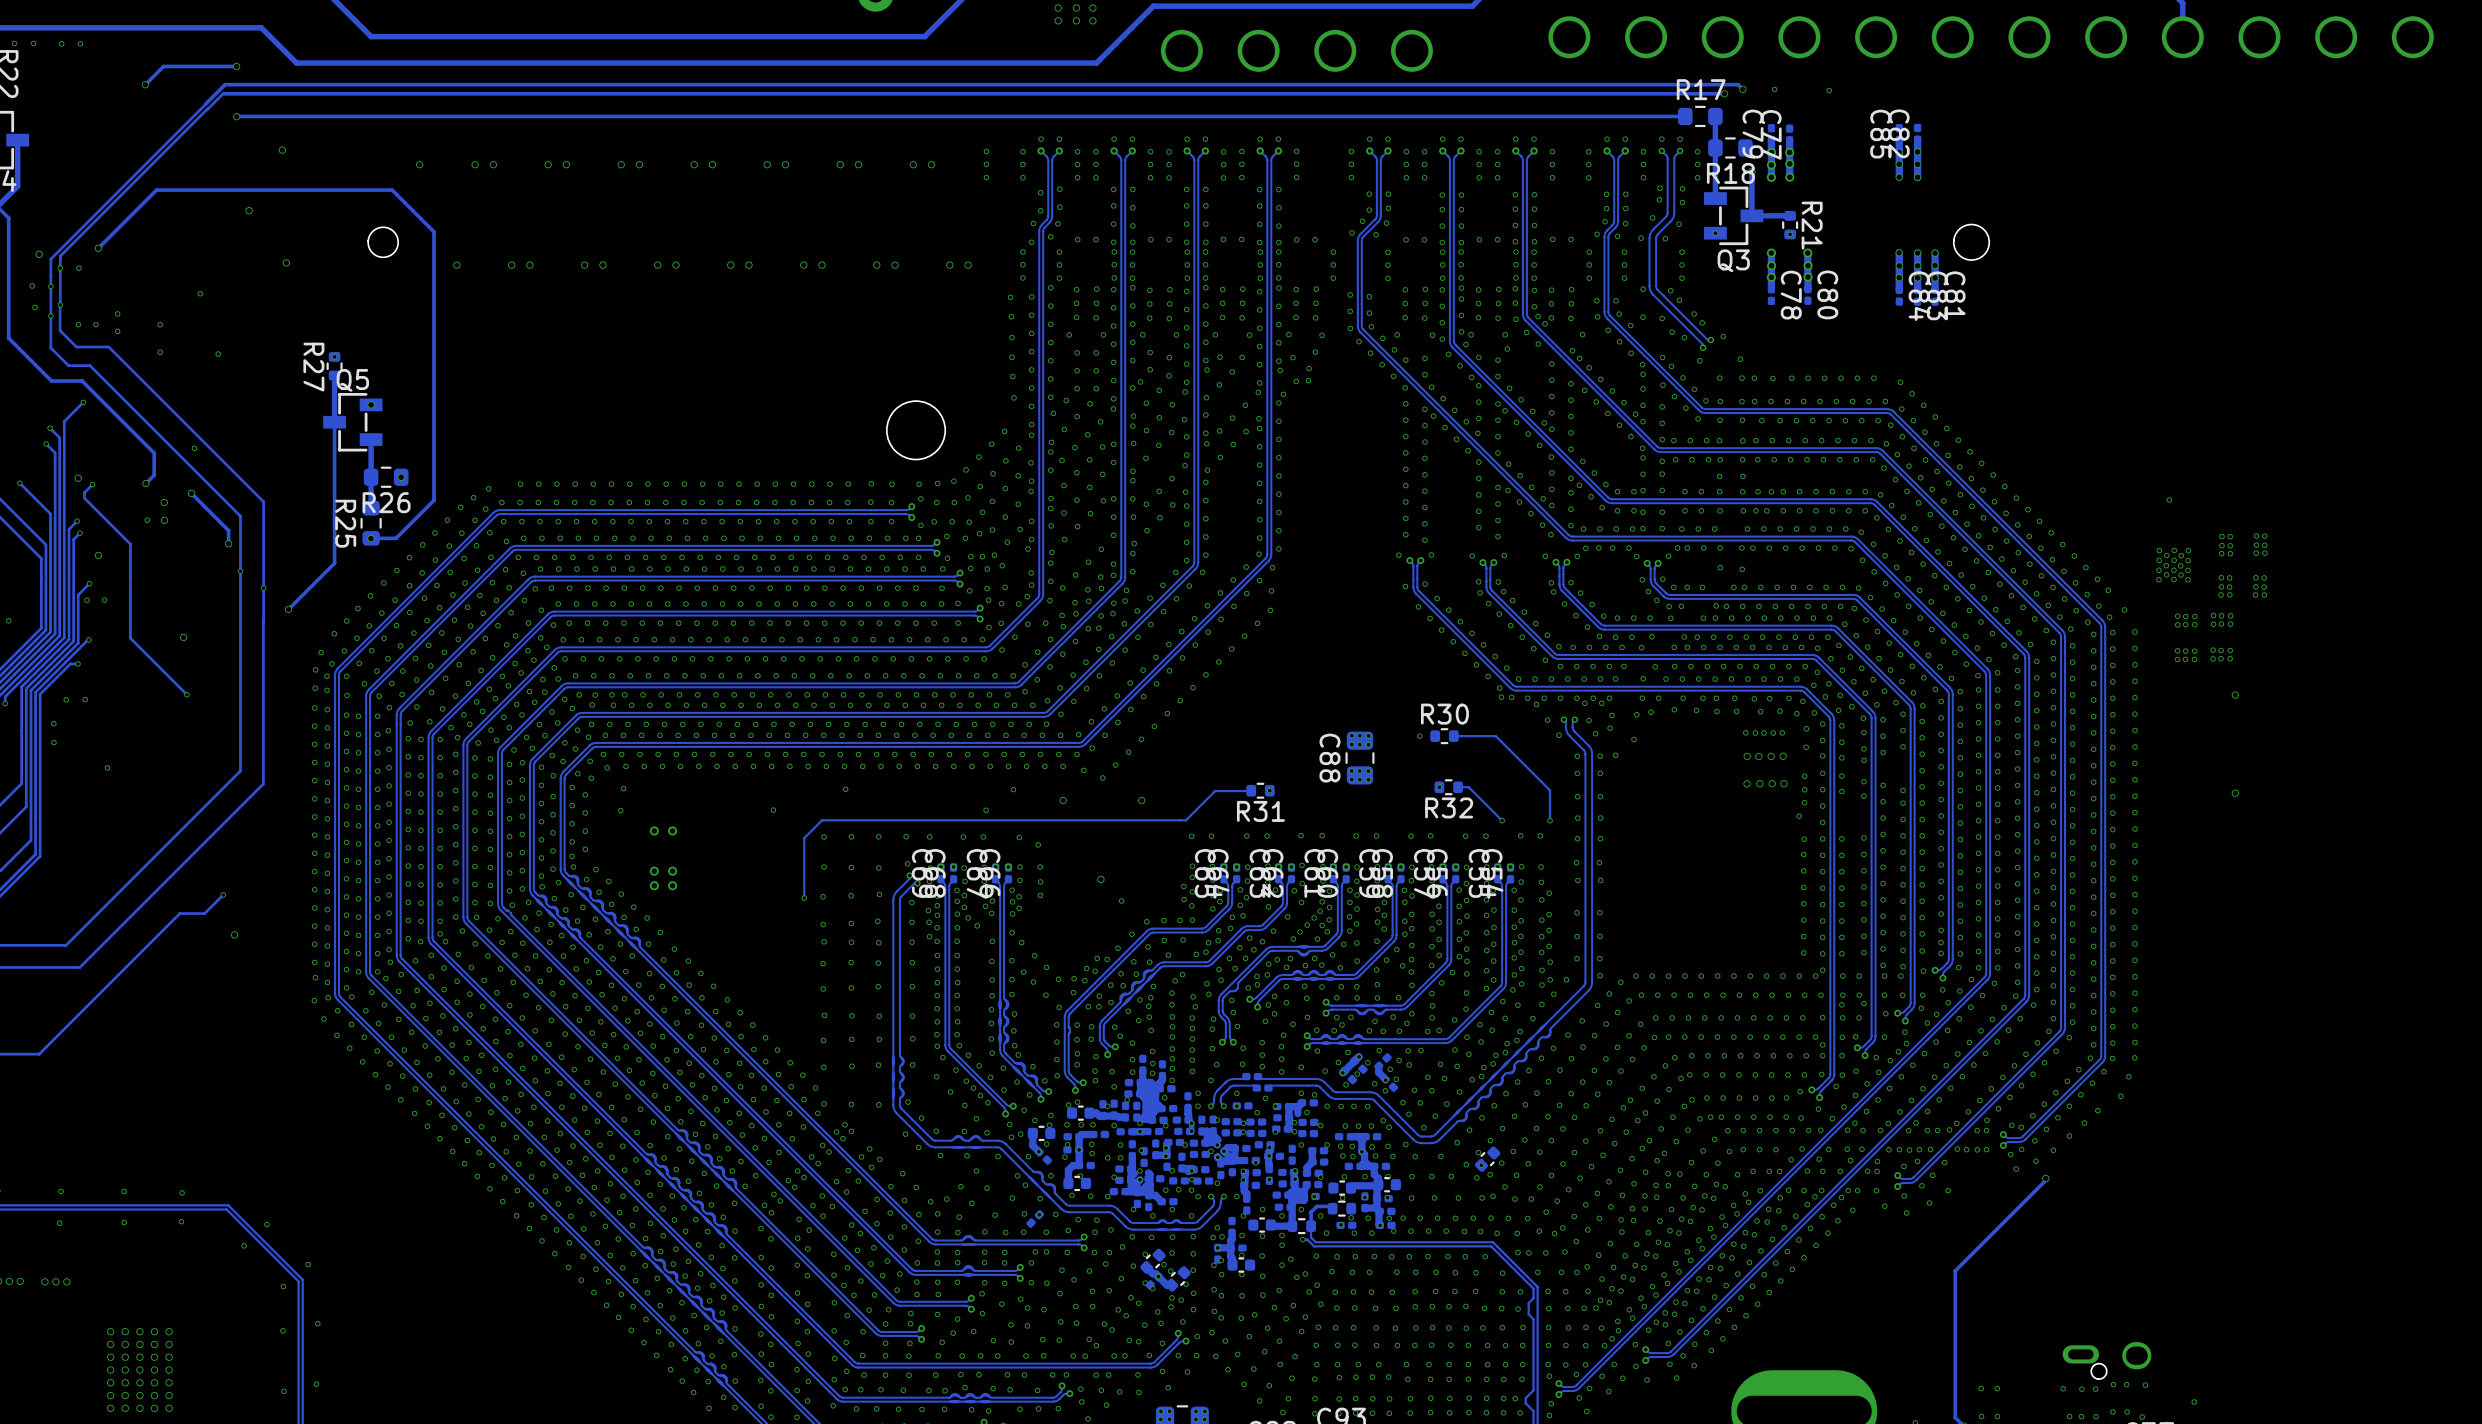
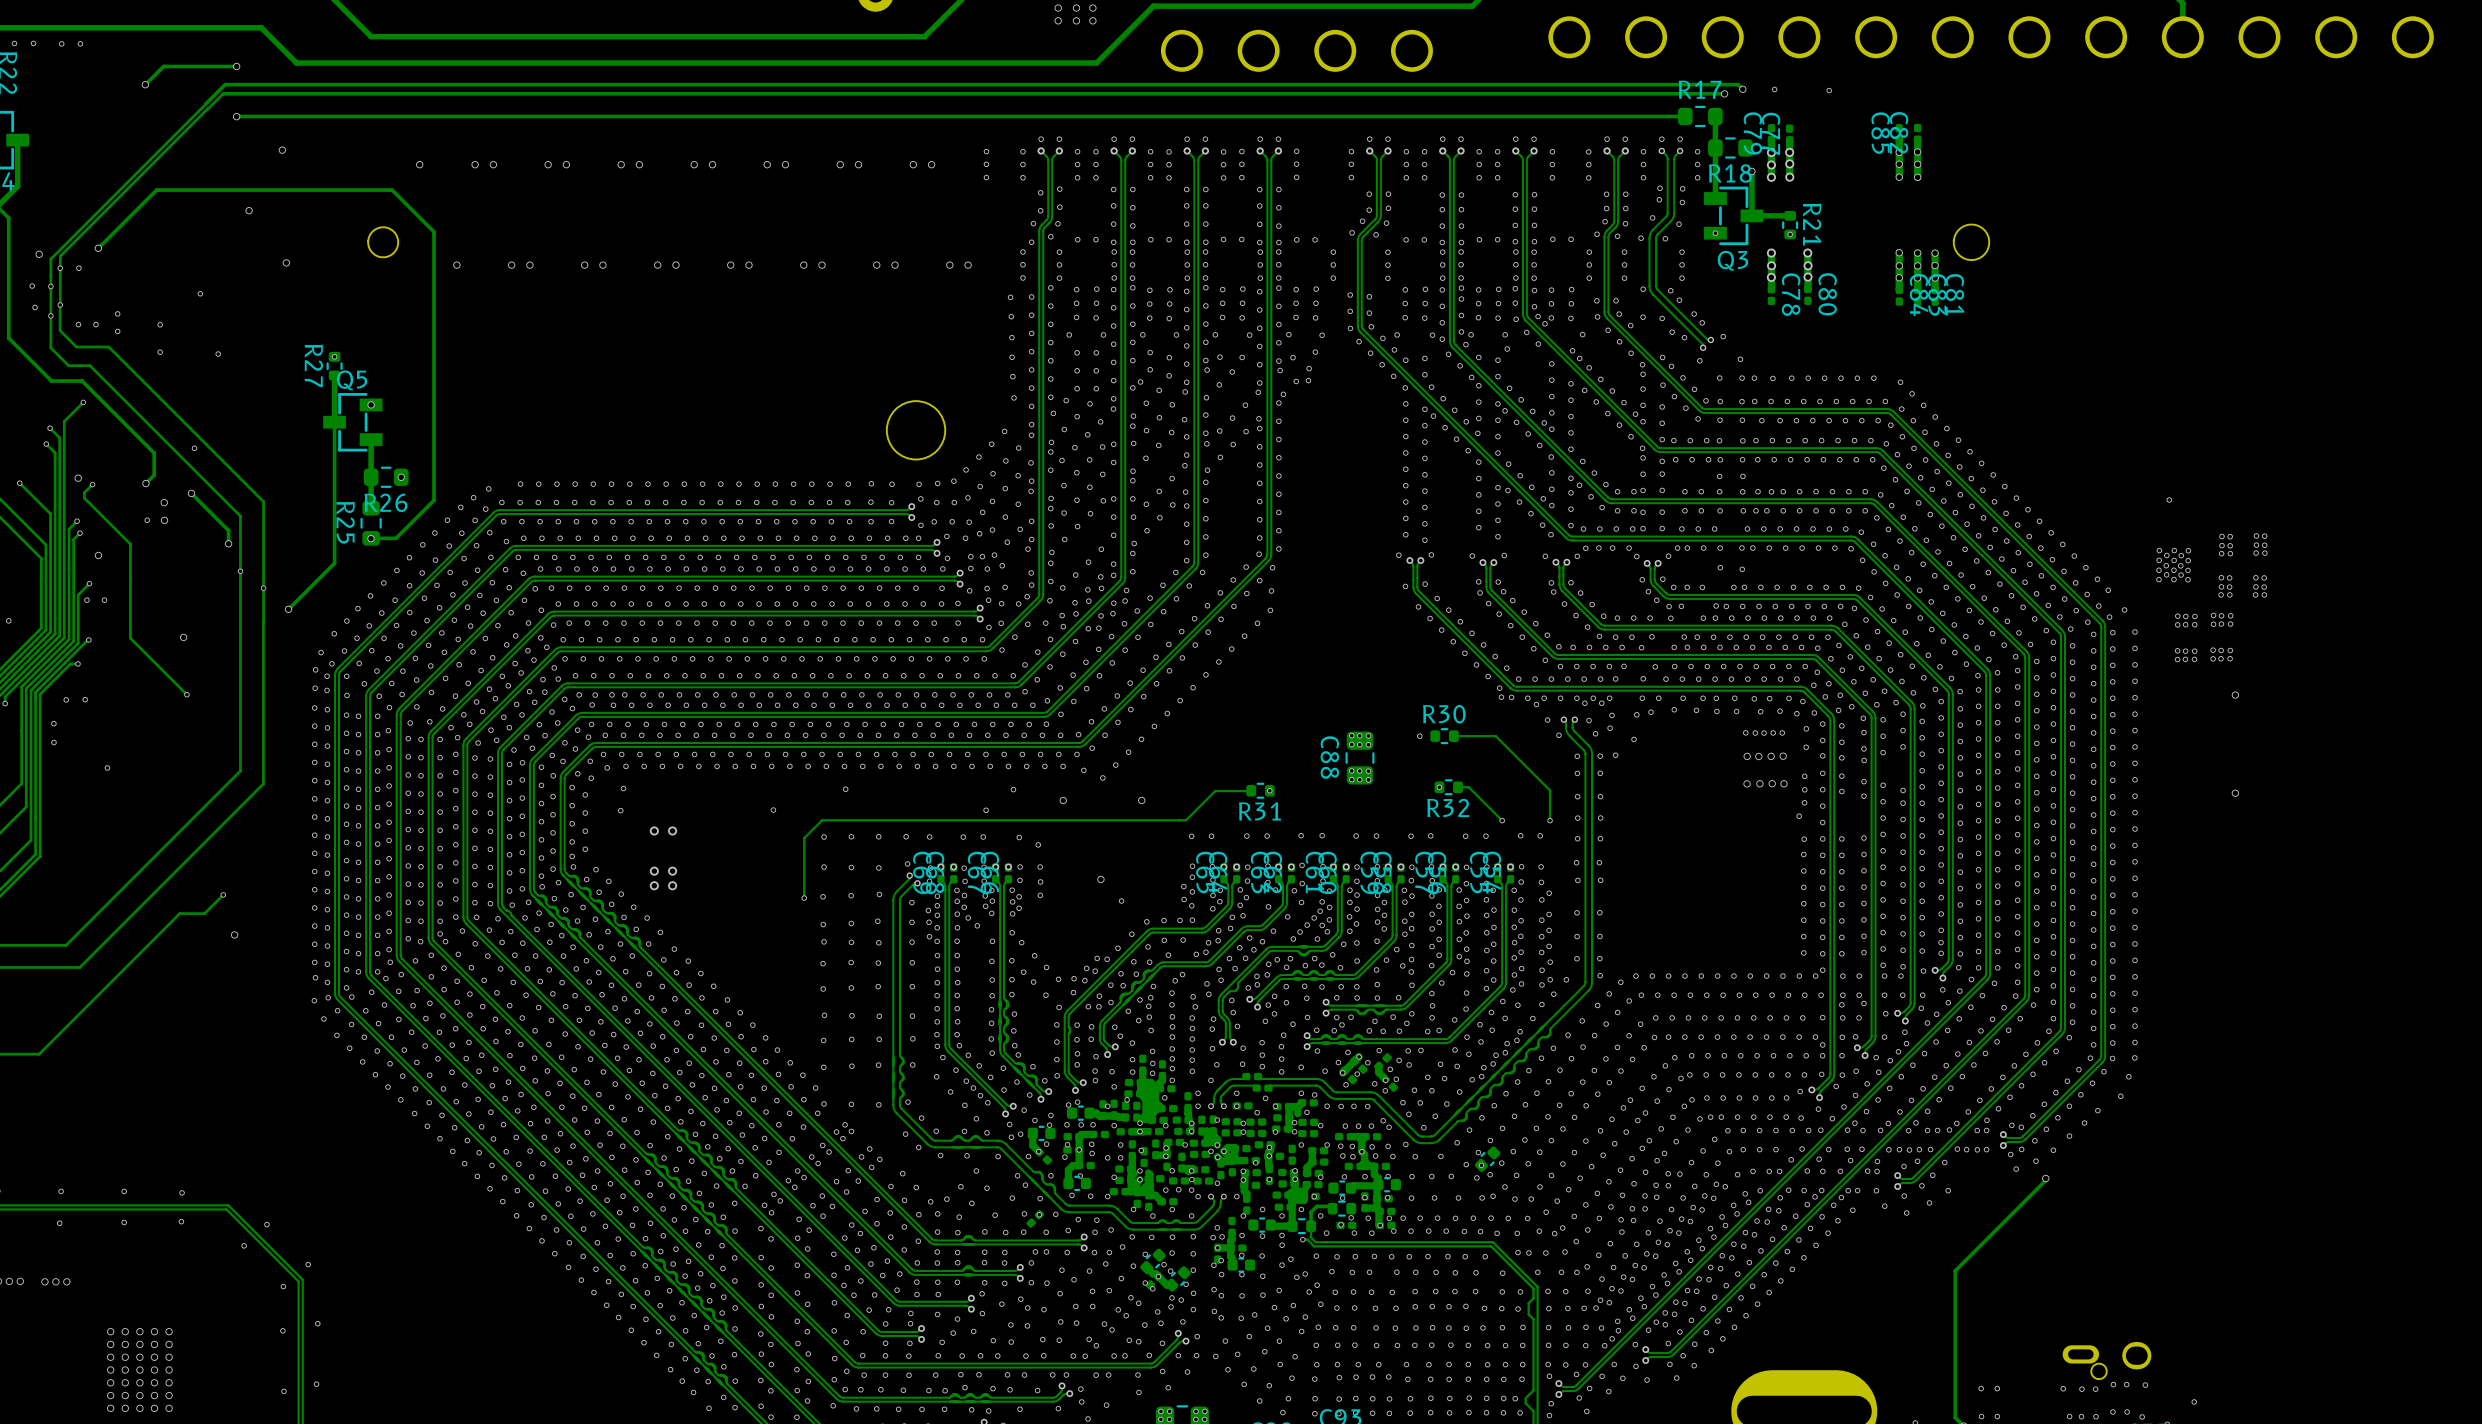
via: (1212, 1332) -> none
via: (1101, 1390) -> none
via: (1119, 1391) -> none
via: (1038, 1408) -> none

